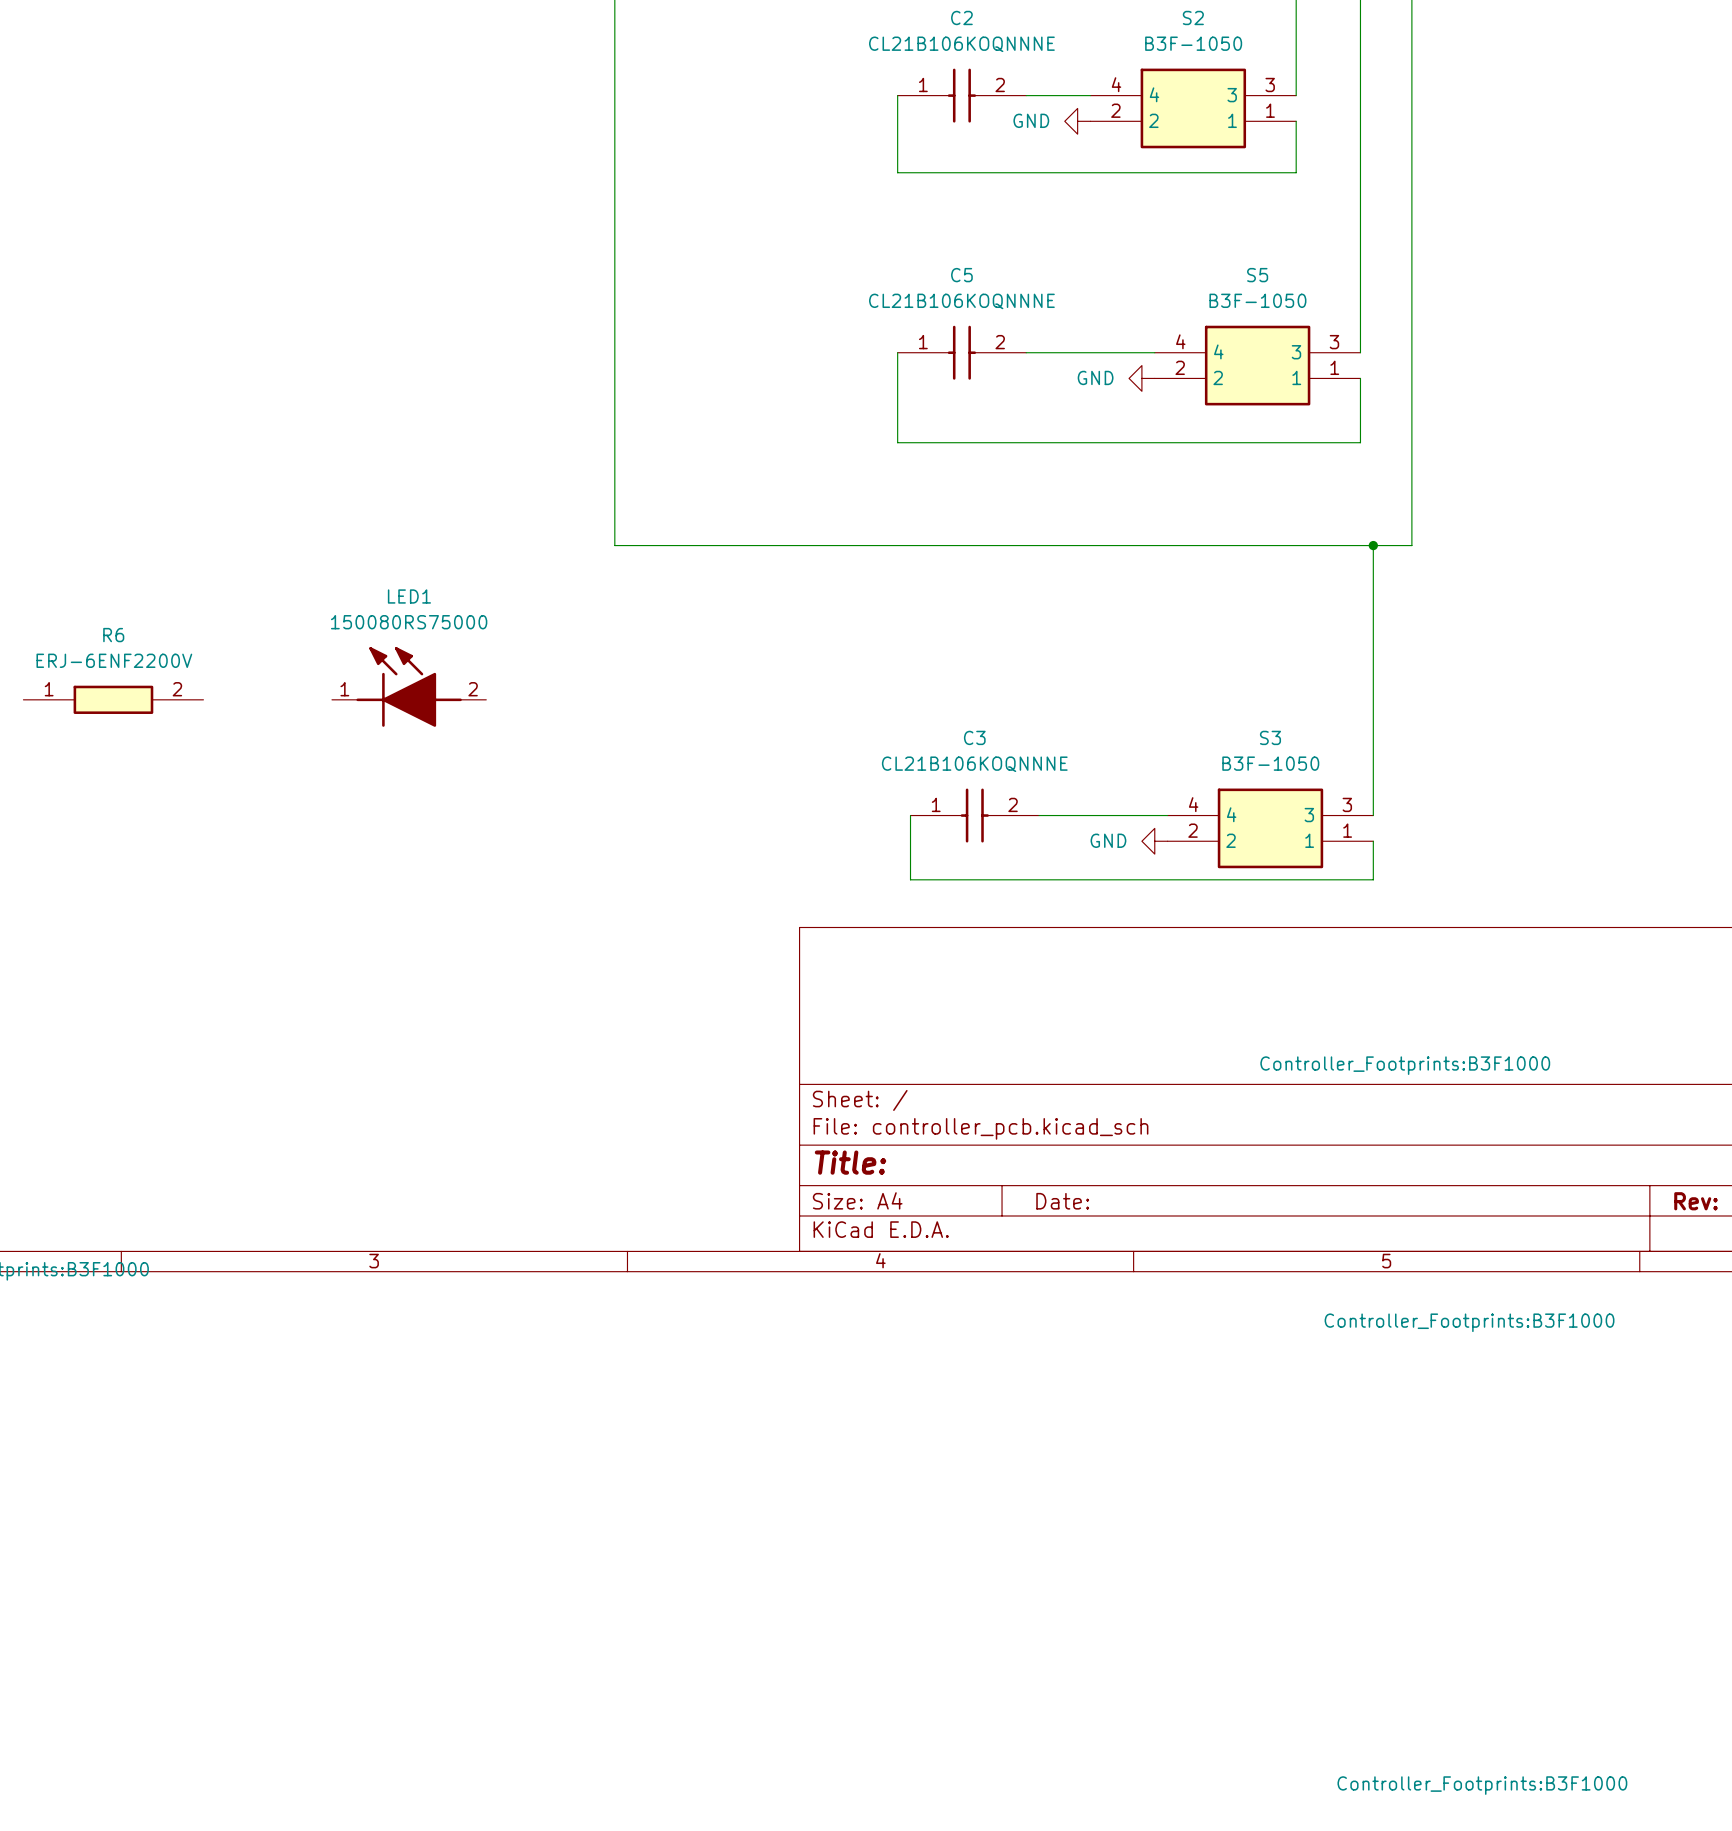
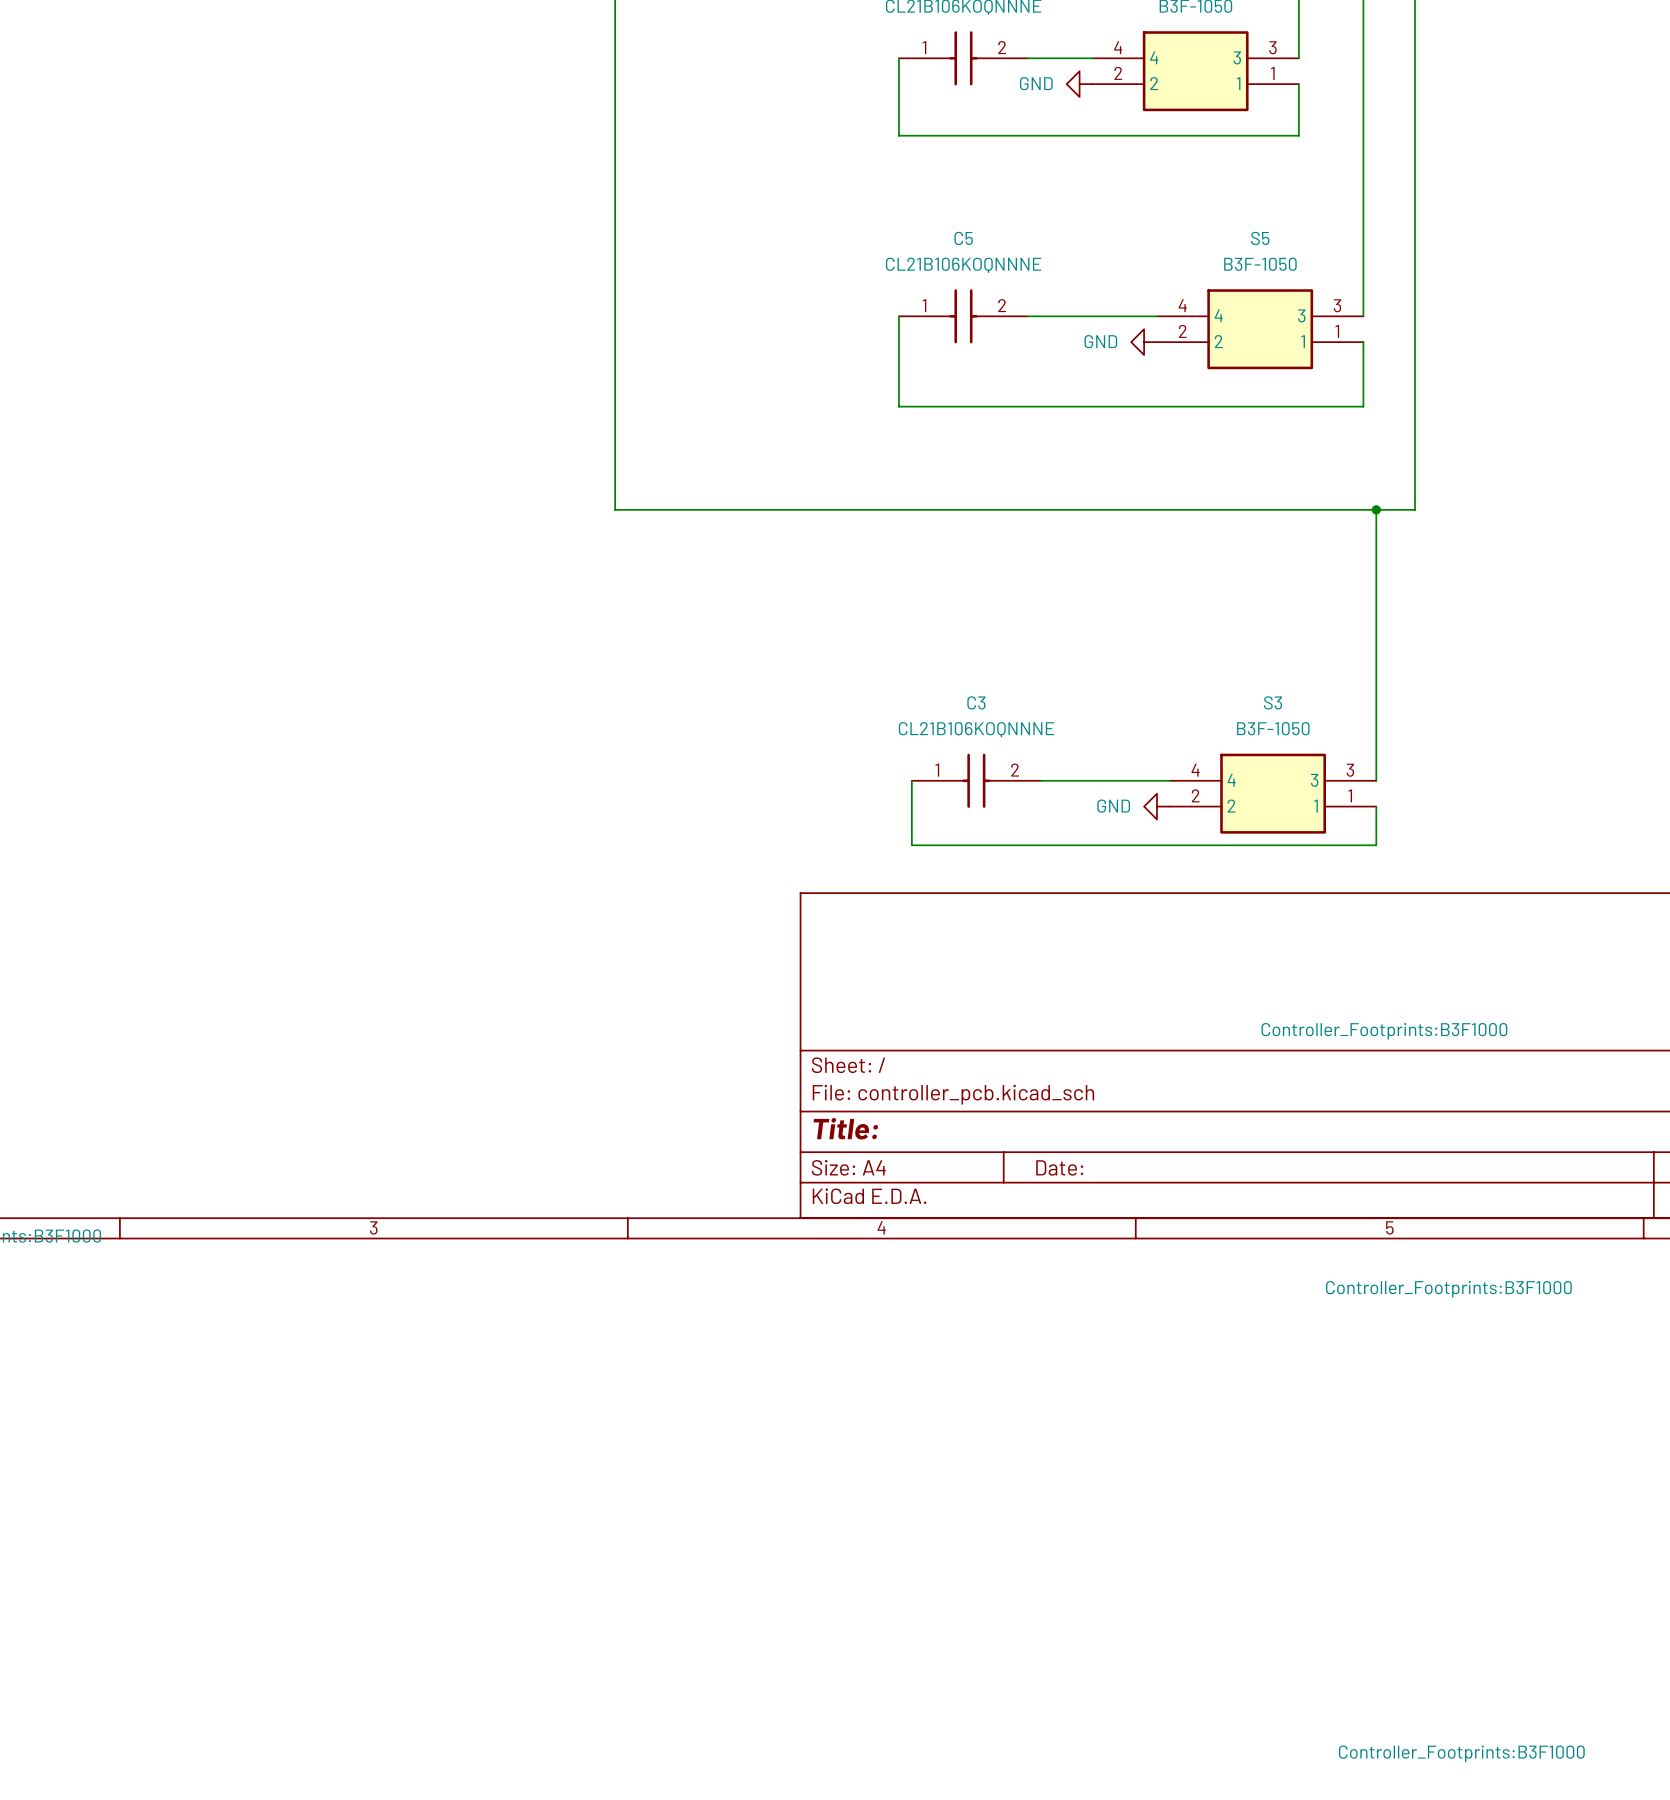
LED1: 150080RS75000 (409, 686) -> none
R6: ERJ-6ENF2200V (113, 699) -> none

